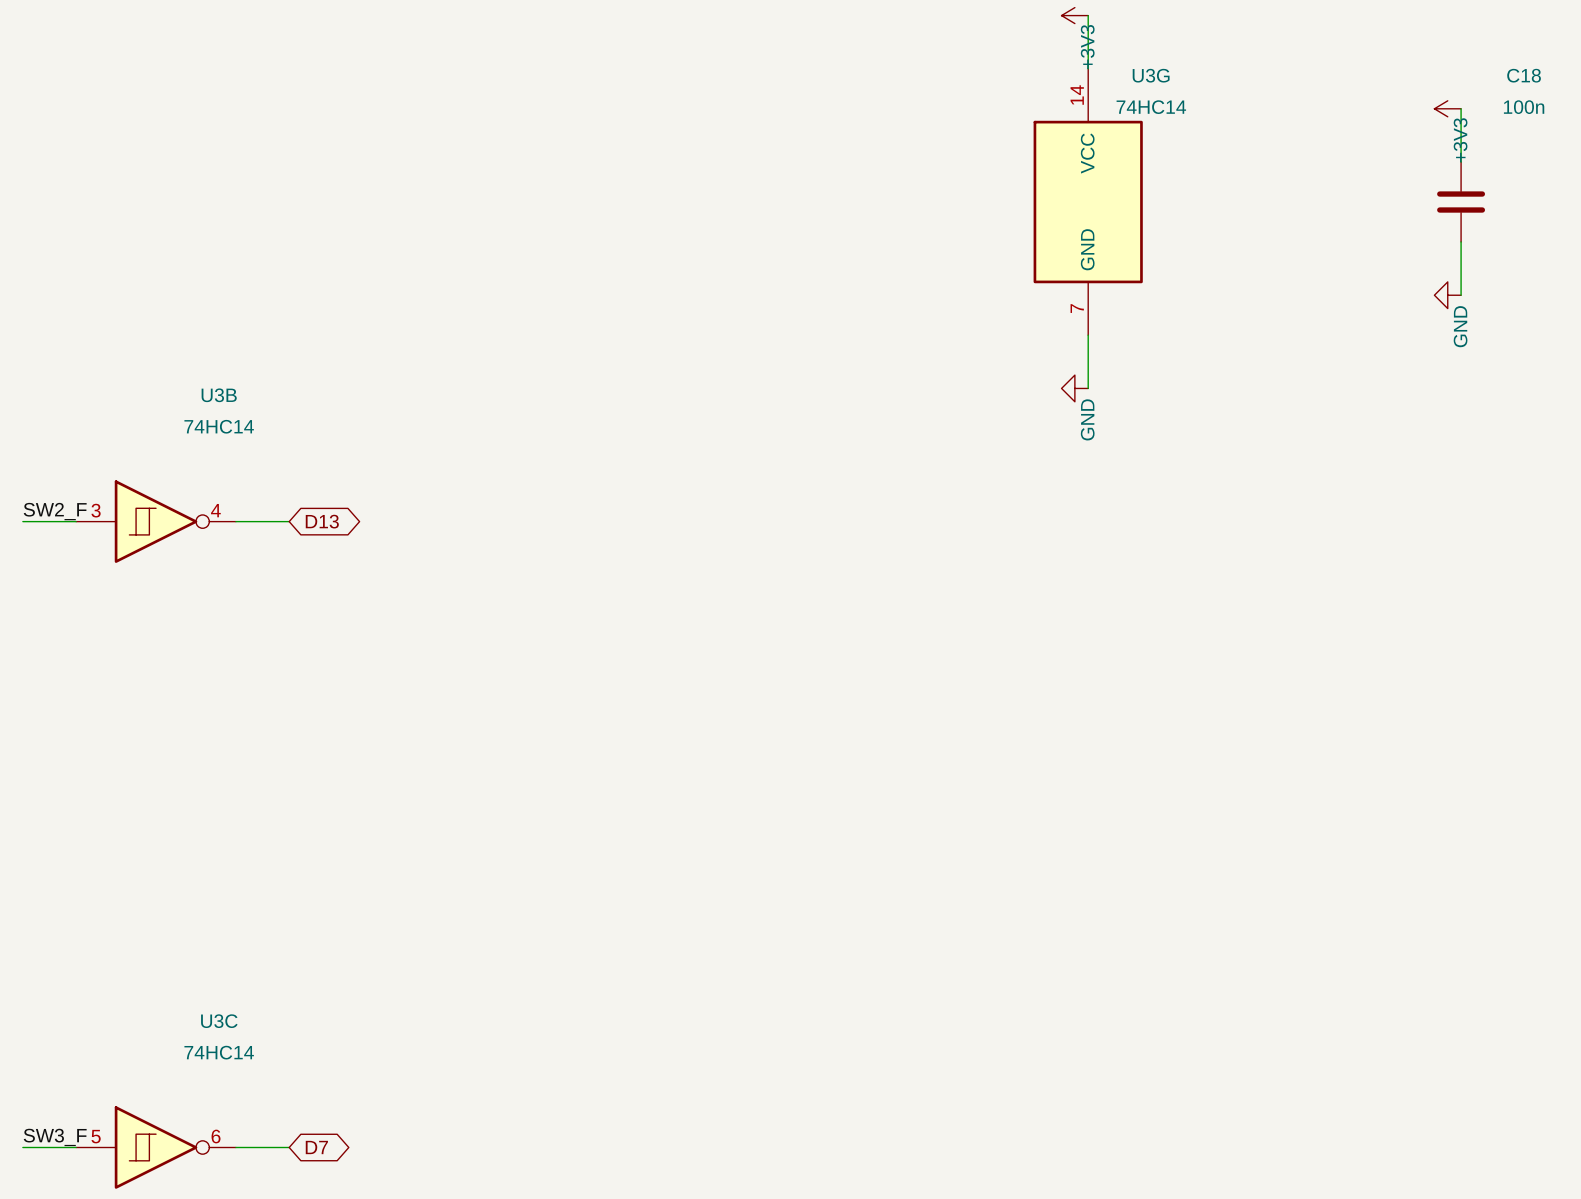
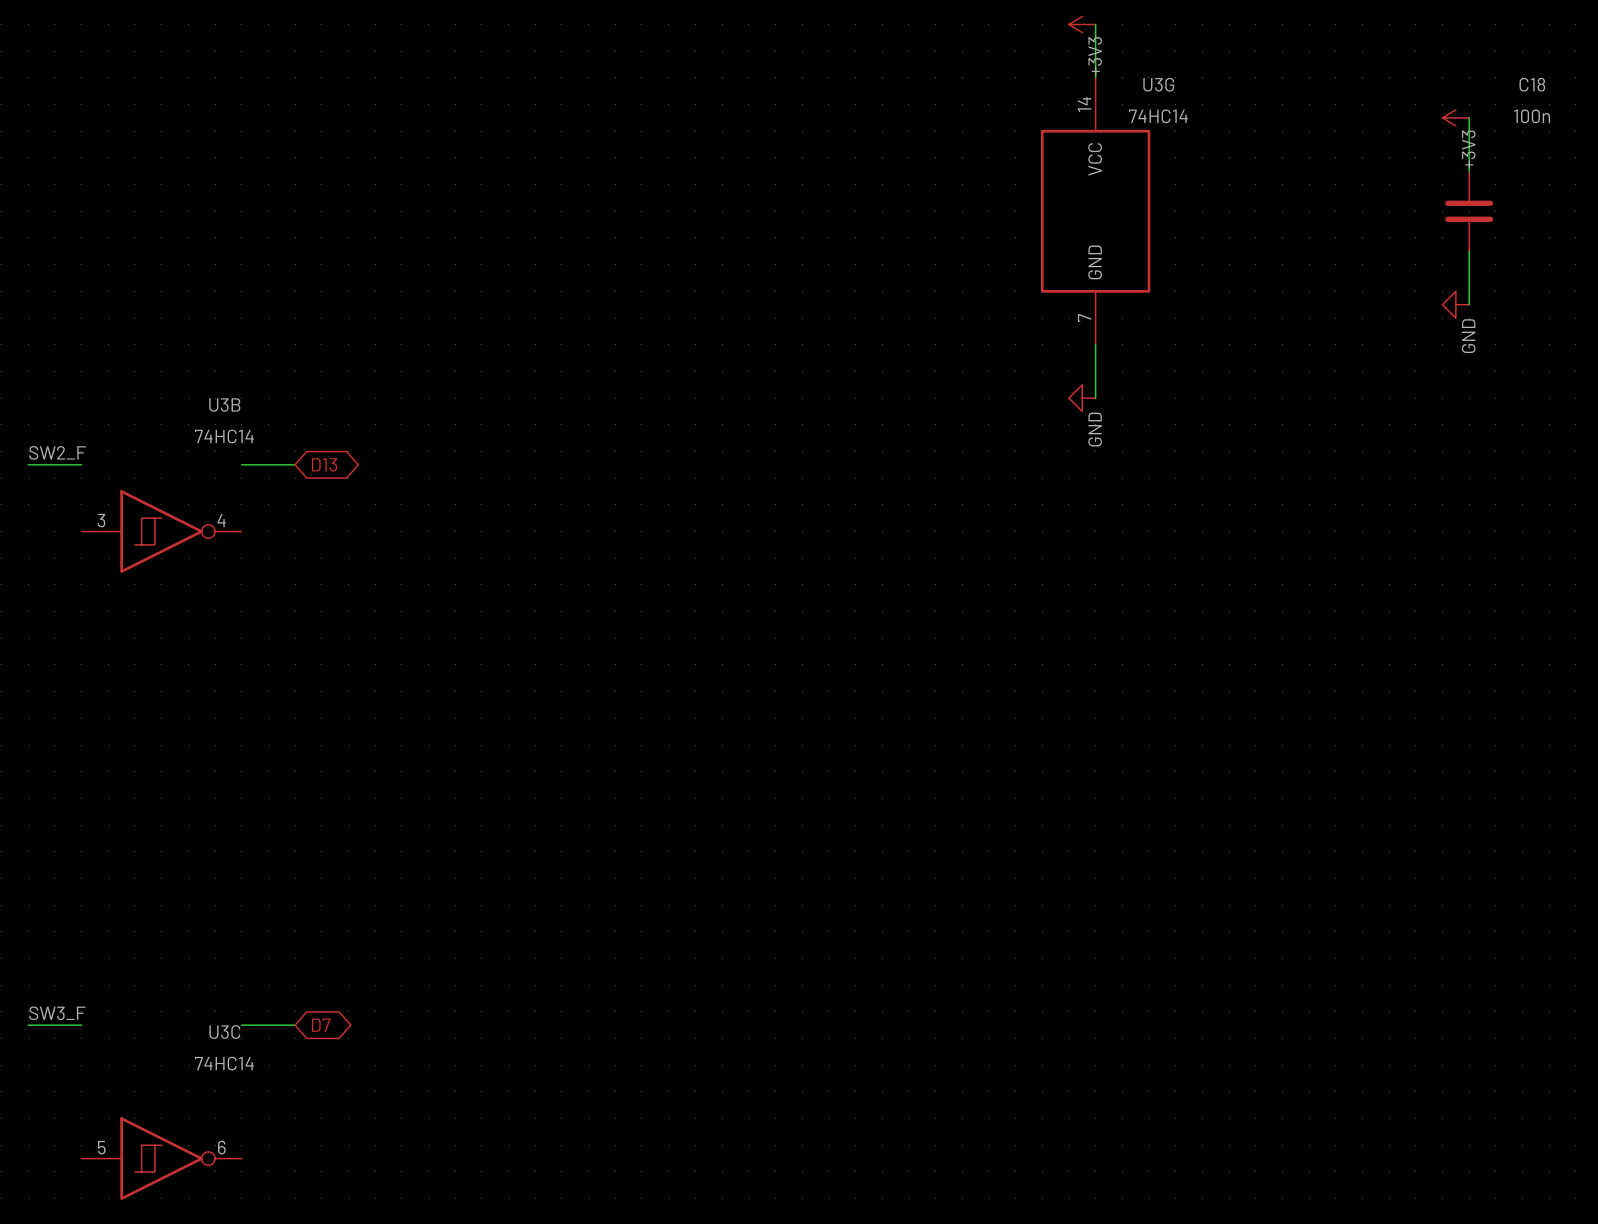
label position: SW2_F (55, 511) -> SW2_F (57, 452)
wire: (22, 521) (76, 521) -> (28, 464) (81, 464)
wire: (235, 521) (289, 521) -> (241, 464) (295, 464)
global label position: D13 (322, 521) -> D13 (324, 464)
label position: SW3_F (55, 1137) -> SW3_F (57, 1013)
wire: (22, 1147) (76, 1147) -> (28, 1025) (81, 1025)
wire: (235, 1147) (289, 1147) -> (241, 1025) (295, 1025)
global label position: D7 (316, 1147) -> D7 (321, 1025)

